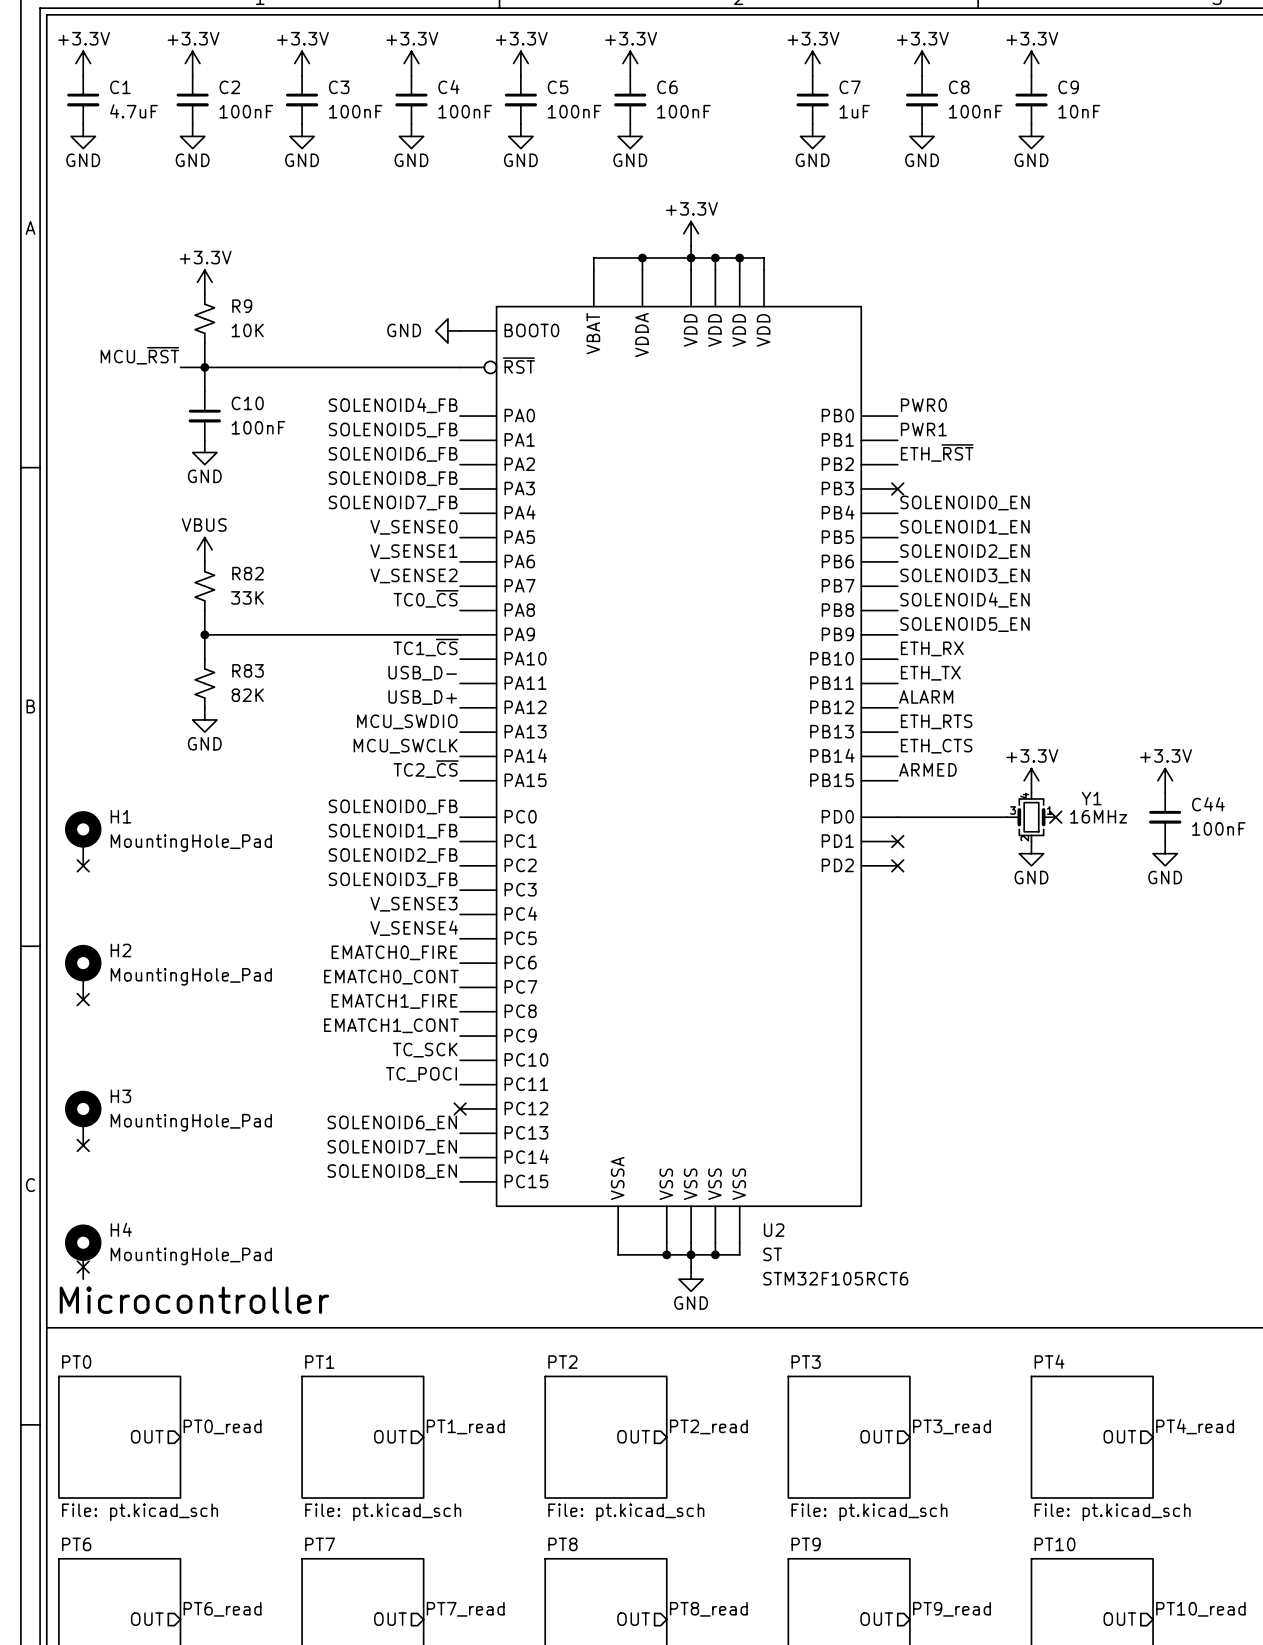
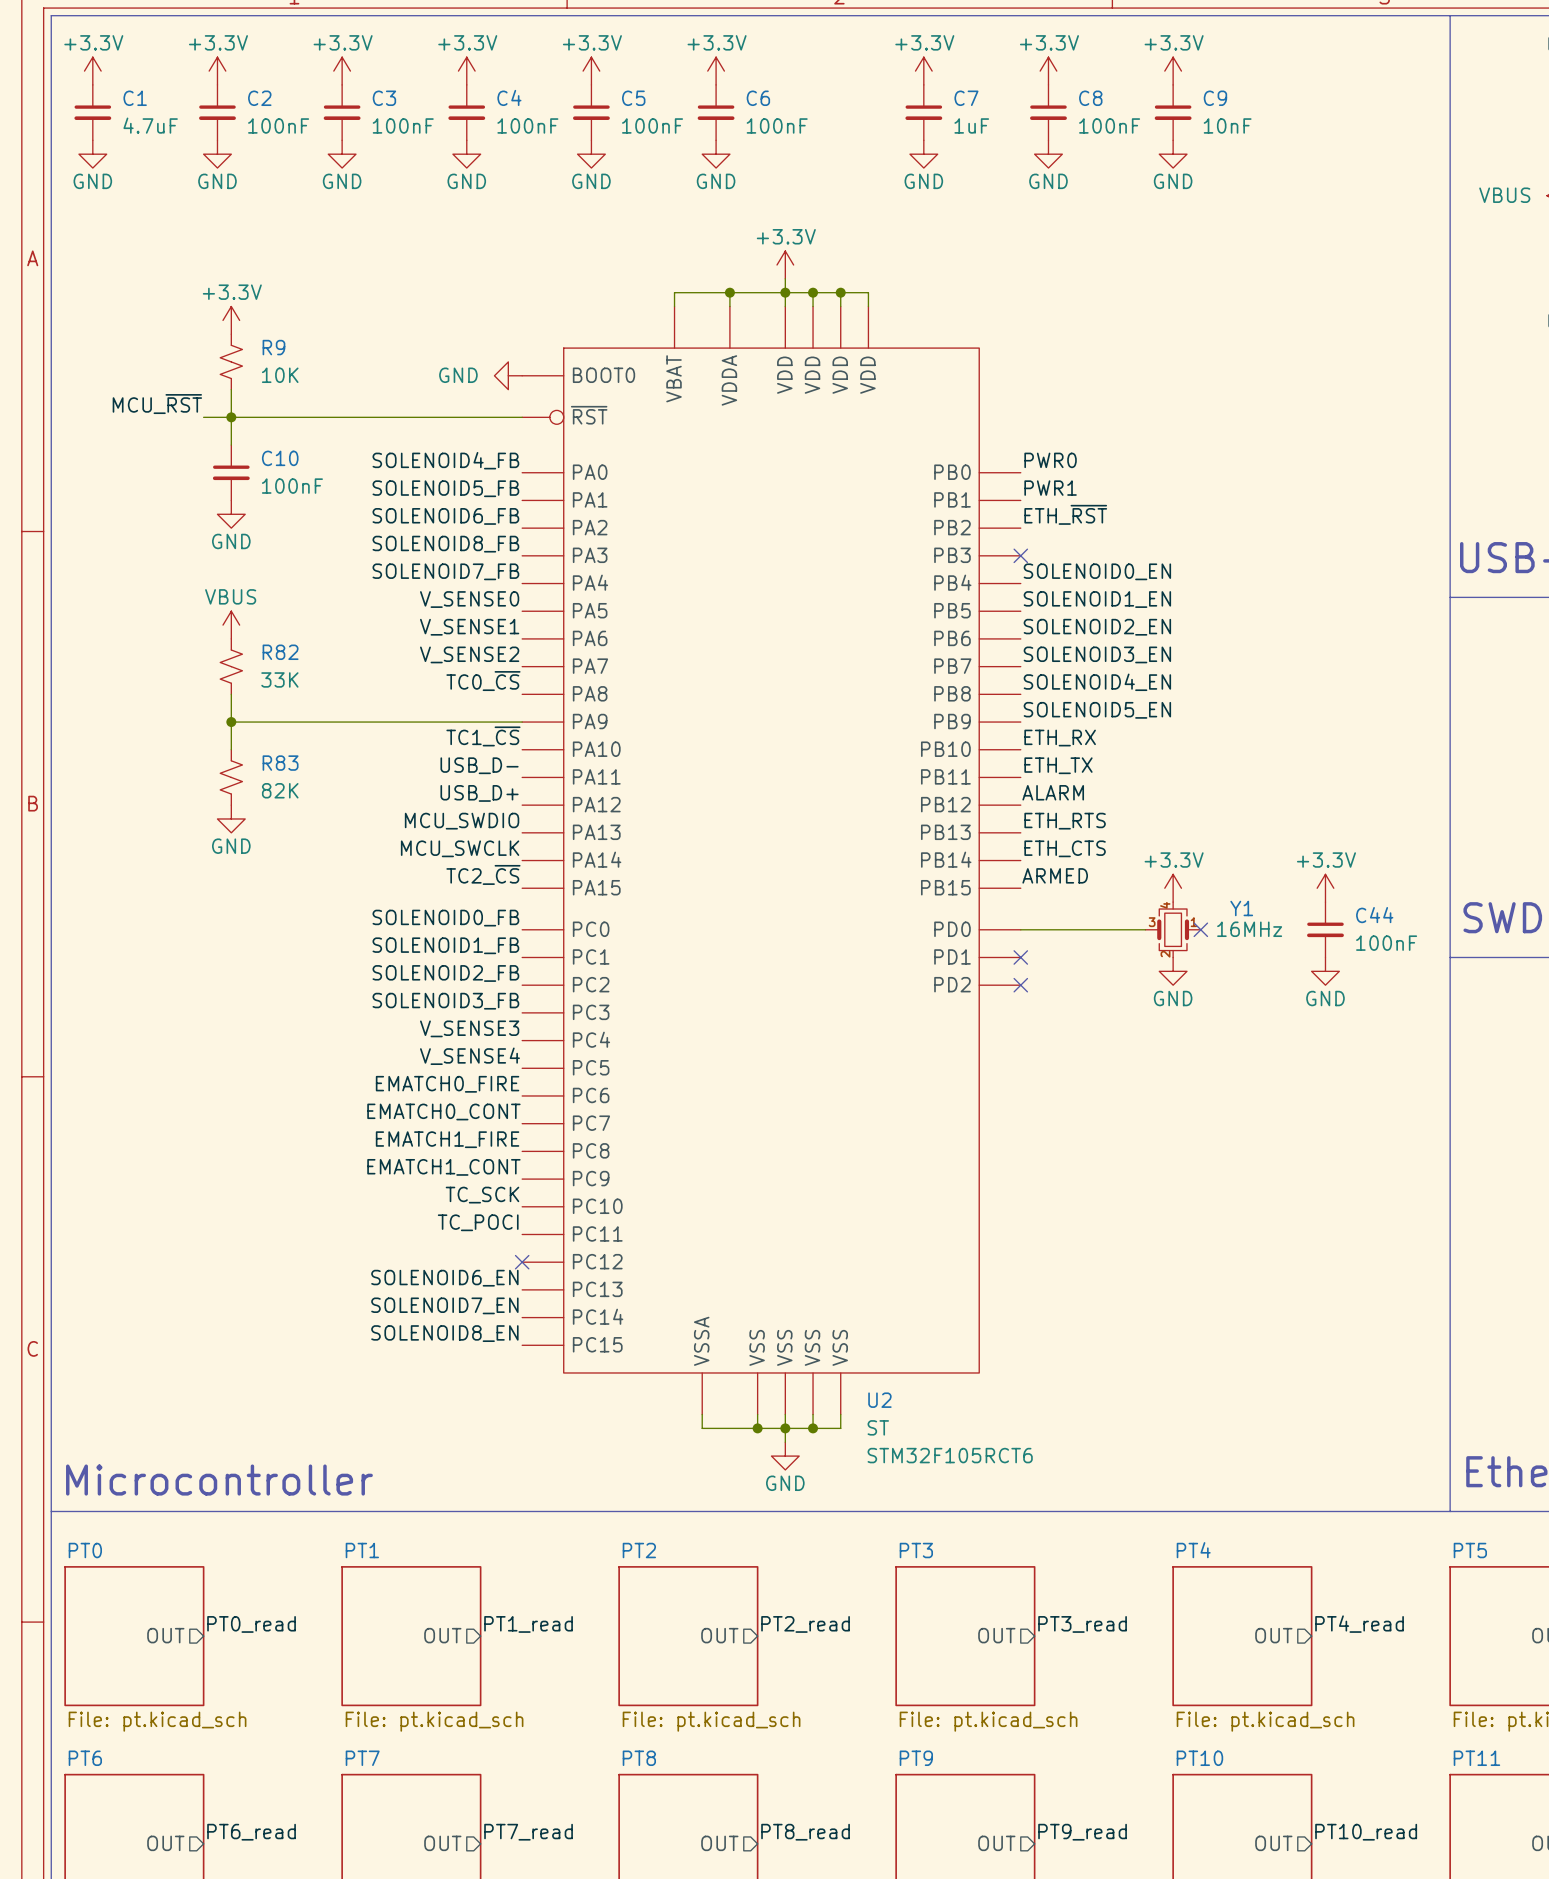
H1: MountingHole_Pad (83, 838) -> none
no-connect mark: (83, 865) -> none
H2: MountingHole_Pad (83, 972) -> none
no-connect mark: (83, 999) -> none
H3: MountingHole_Pad (83, 1118) -> none
no-connect mark: (83, 1145) -> none
H4: MountingHole_Pad (83, 1251) -> none
no-connect mark: (83, 1267) -> none

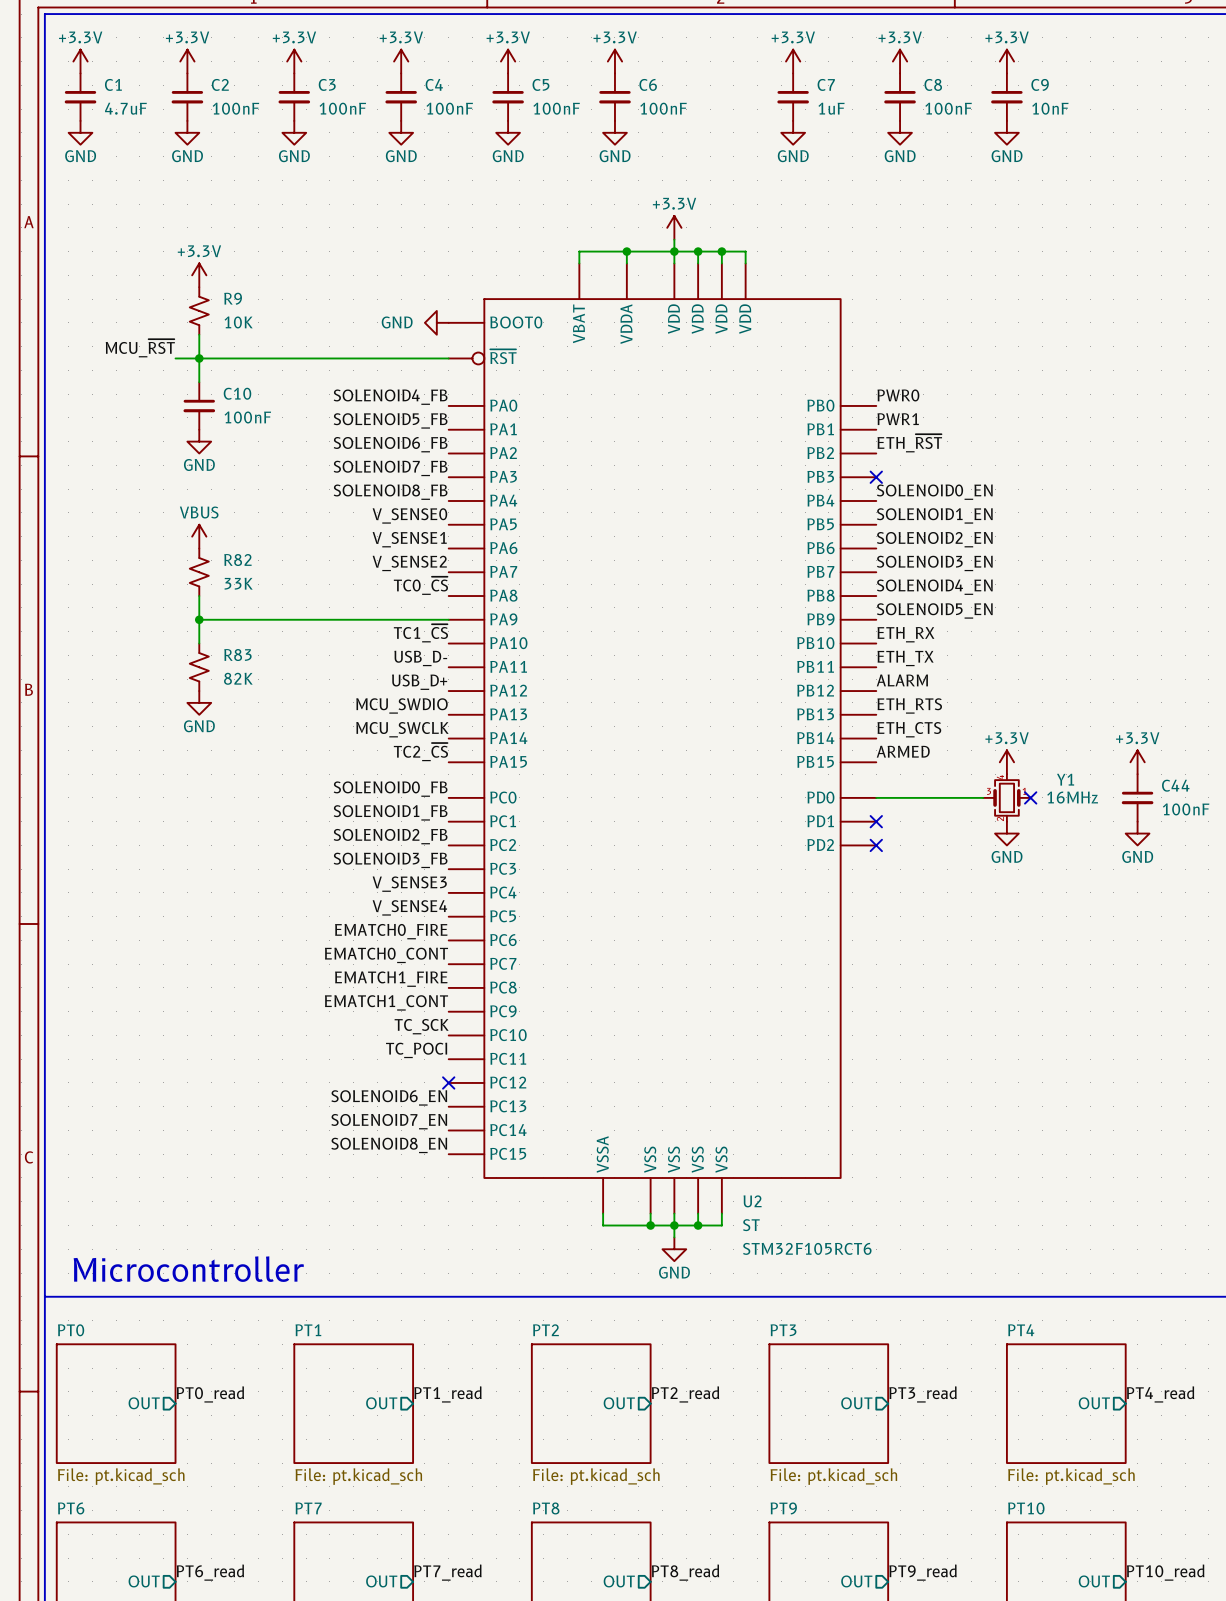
label: SOLENOID8_FB (445, 544) -> SOLENOID7_FB (390, 468)
label: SOLENOID7_FB (445, 571) -> SOLENOID8_FB (390, 492)

